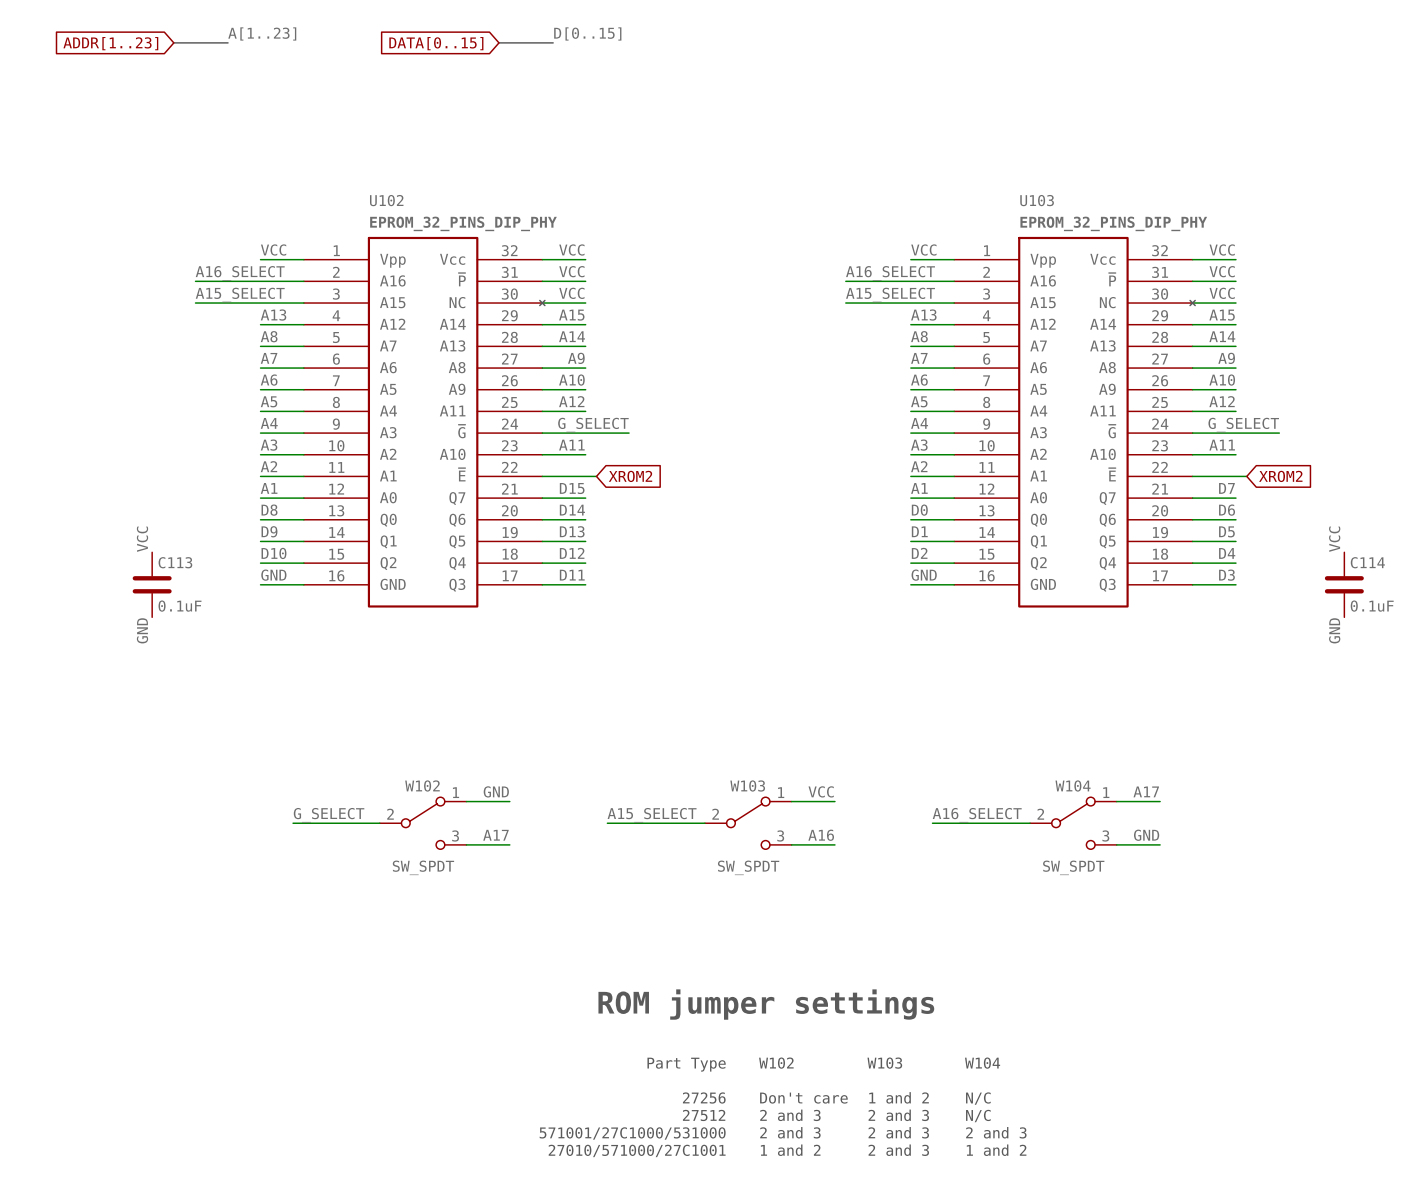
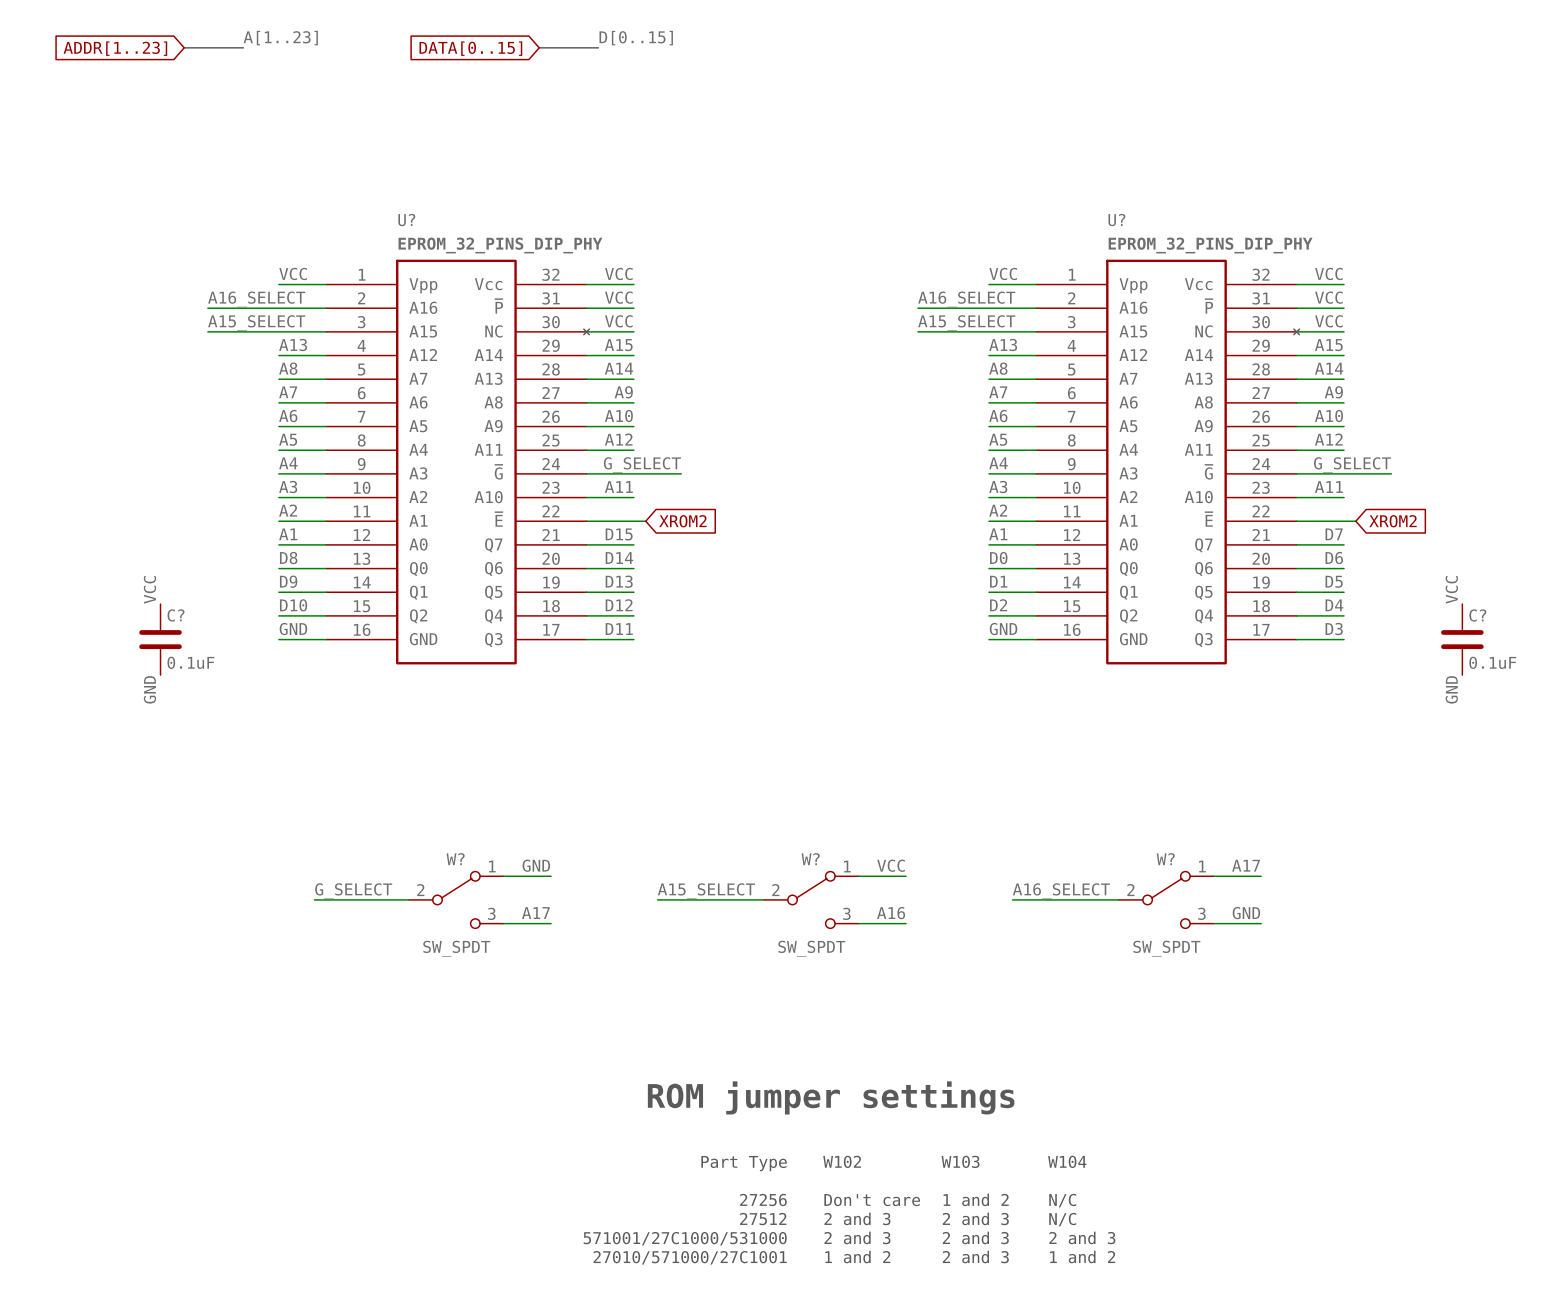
U102 name: U102 (386, 200) -> U? (406, 220)
U103 name: U103 (1037, 200) -> U? (1116, 220)
C113 name: C113 (175, 562) -> C? (175, 615)
C114 name: C114 (1367, 562) -> C? (1477, 615)
W102 name: W102 (422, 785) -> W? (455, 859)
W103 name: W103 (747, 785) -> W? (810, 859)
W104 name: W104 (1073, 785) -> W? (1165, 859)

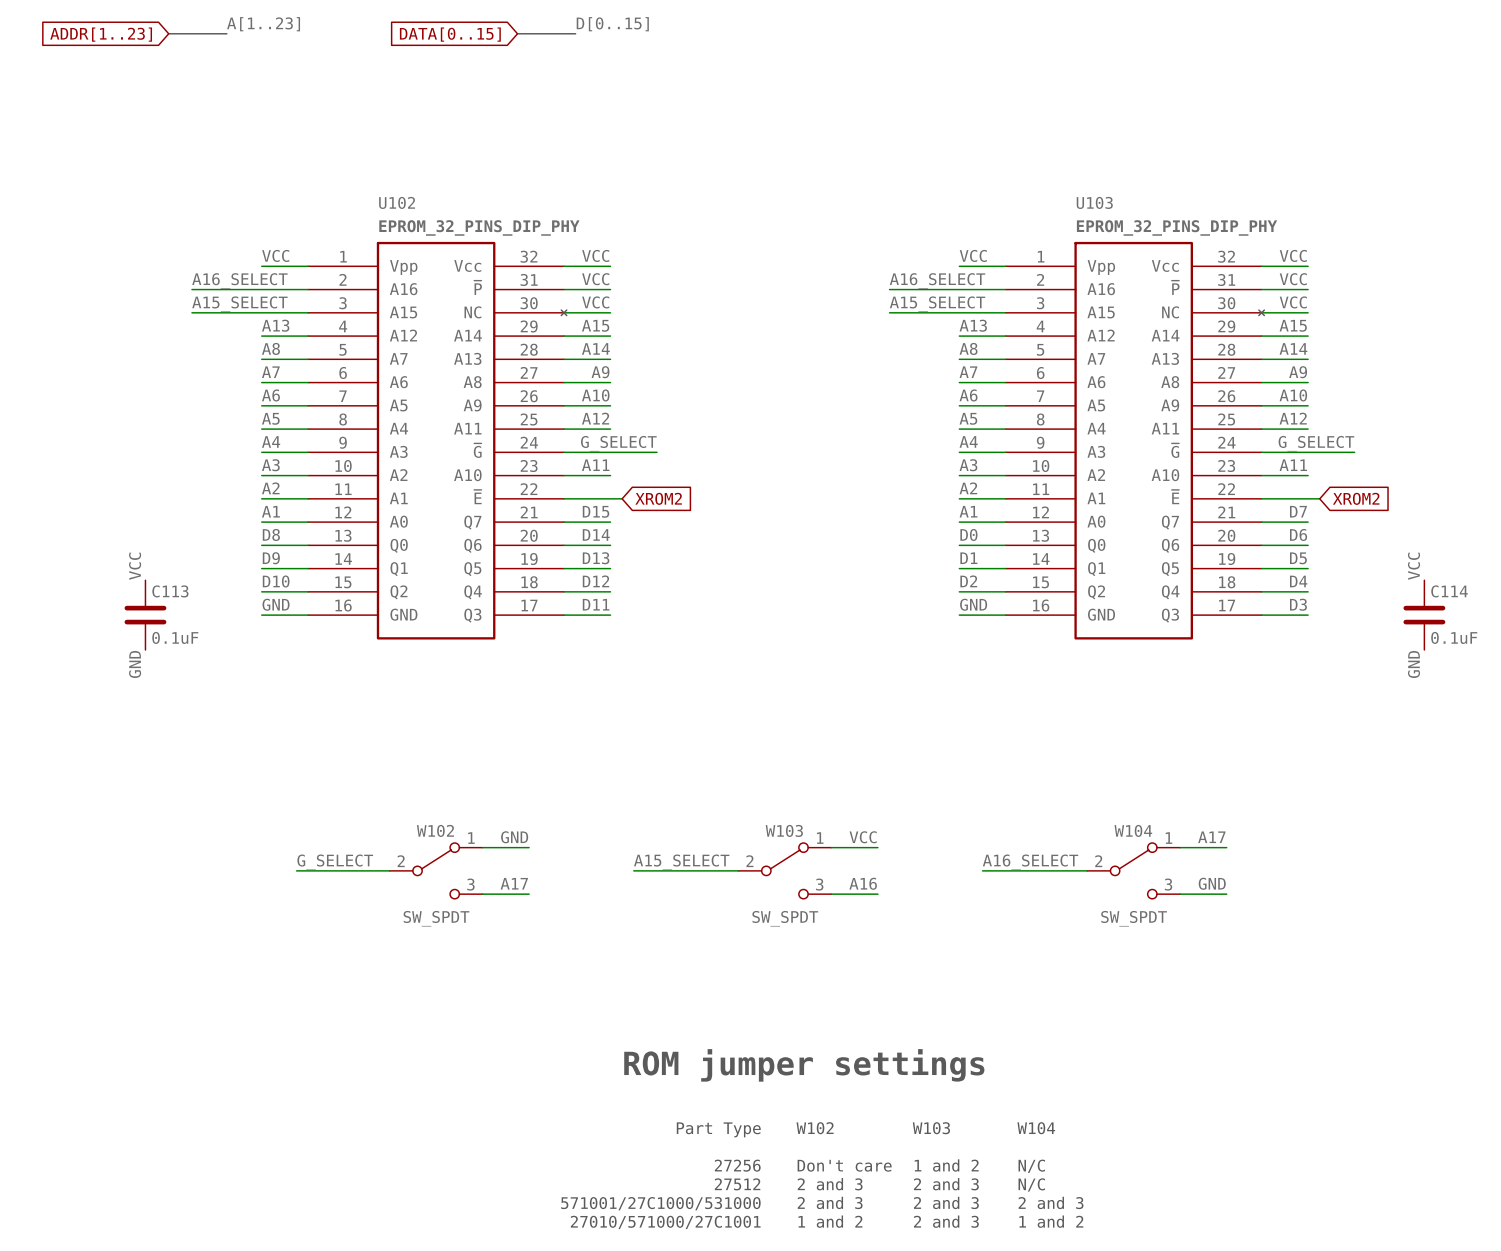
U? name: U? (406, 220) -> U102 (397, 202)
U? name: U? (1116, 220) -> U103 (1094, 202)
C? name: C? (175, 615) -> C113 (170, 591)
C? name: C? (1477, 615) -> C114 (1449, 591)
W? name: W? (455, 859) -> W102 (435, 830)
W? name: W? (810, 859) -> W103 (784, 830)
W? name: W? (1165, 859) -> W104 (1133, 830)

